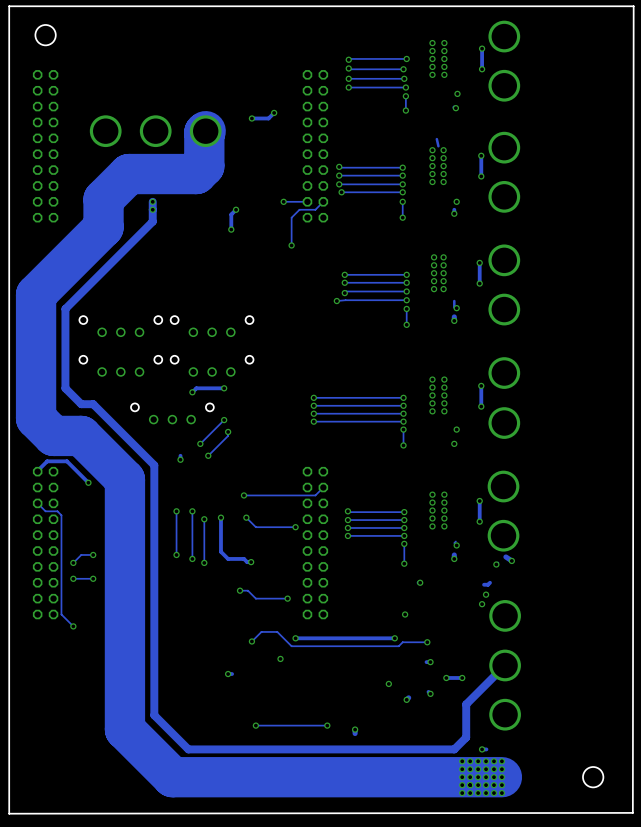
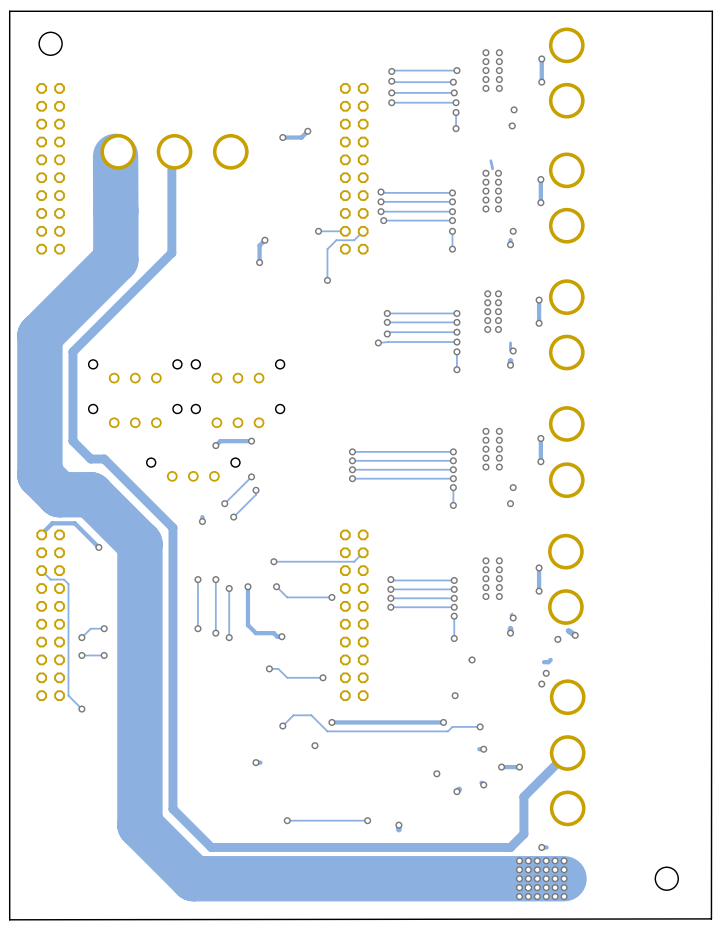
track: (205, 131) (204, 166) (196, 174) (128, 174) (103, 199) -> (115, 156) (115, 228)
track: (152, 201) (152, 221) -> (171, 156) (171, 253)
via: (152, 201) -> none
via: (152, 209) -> none

